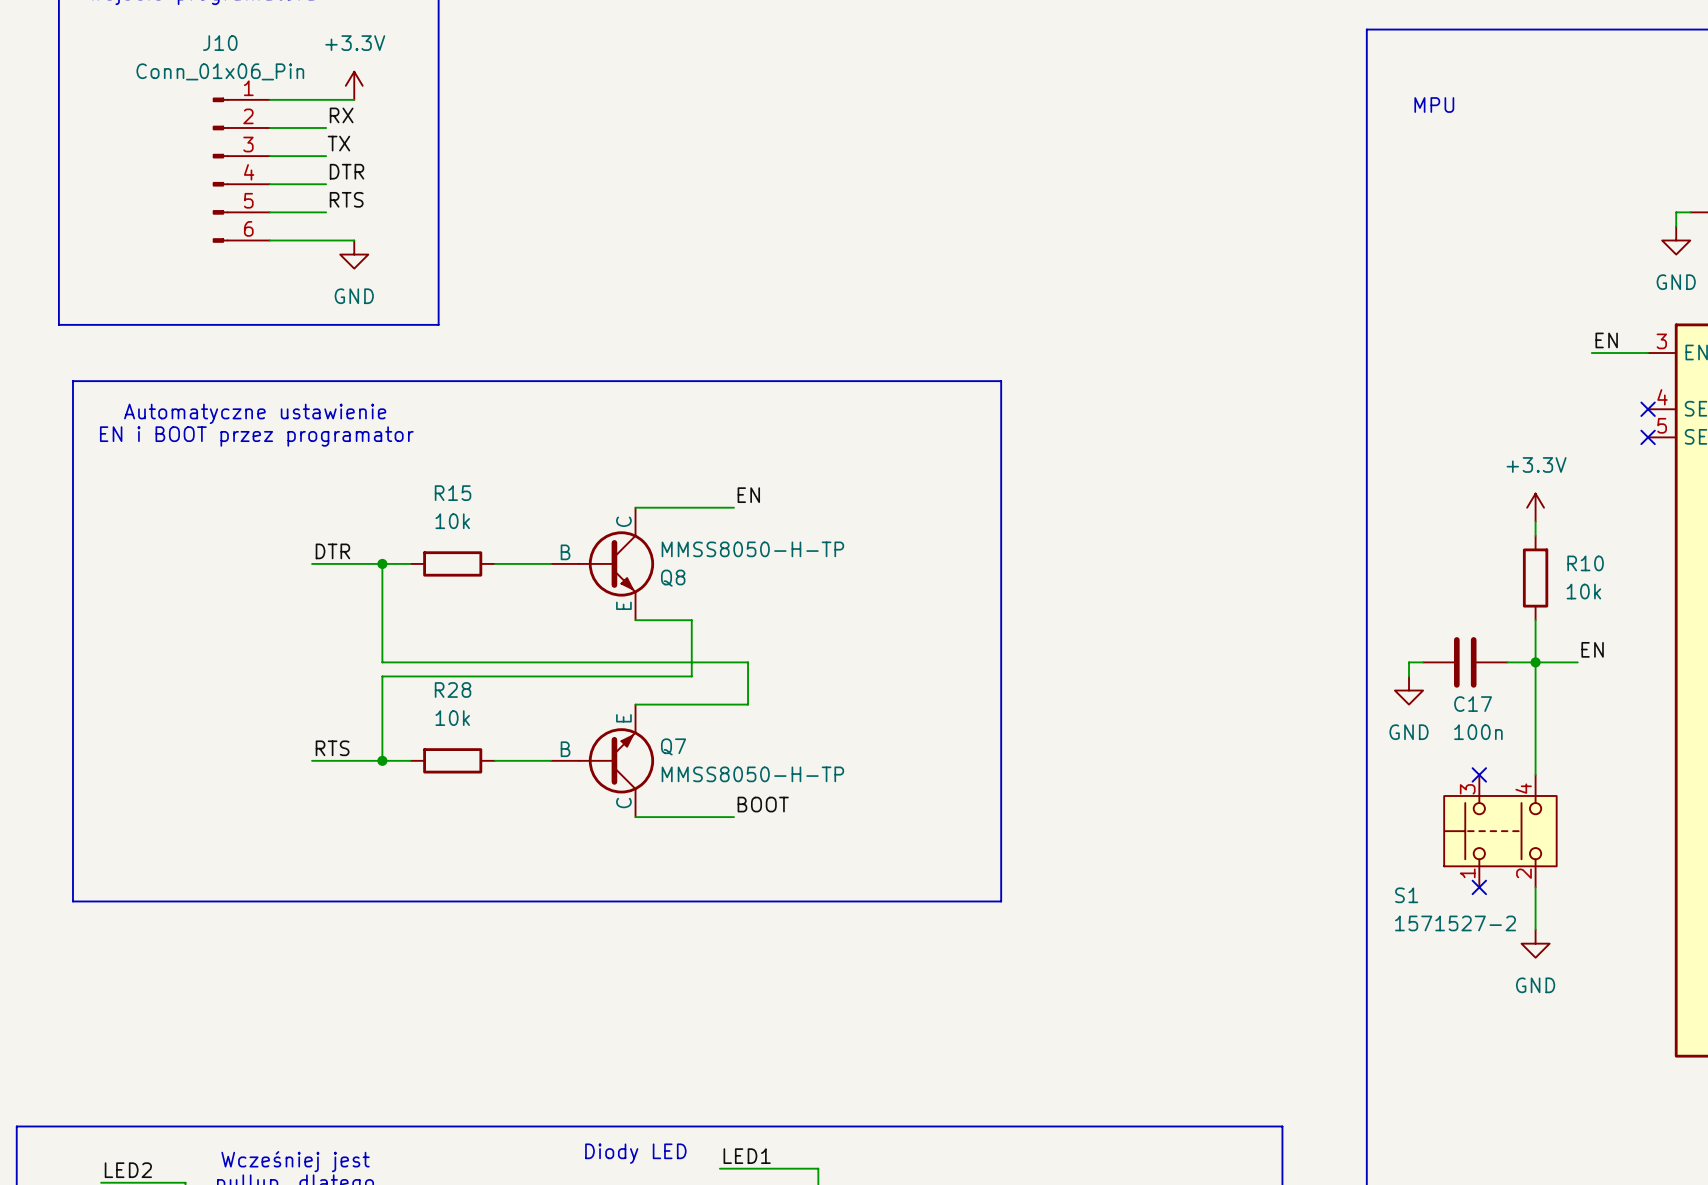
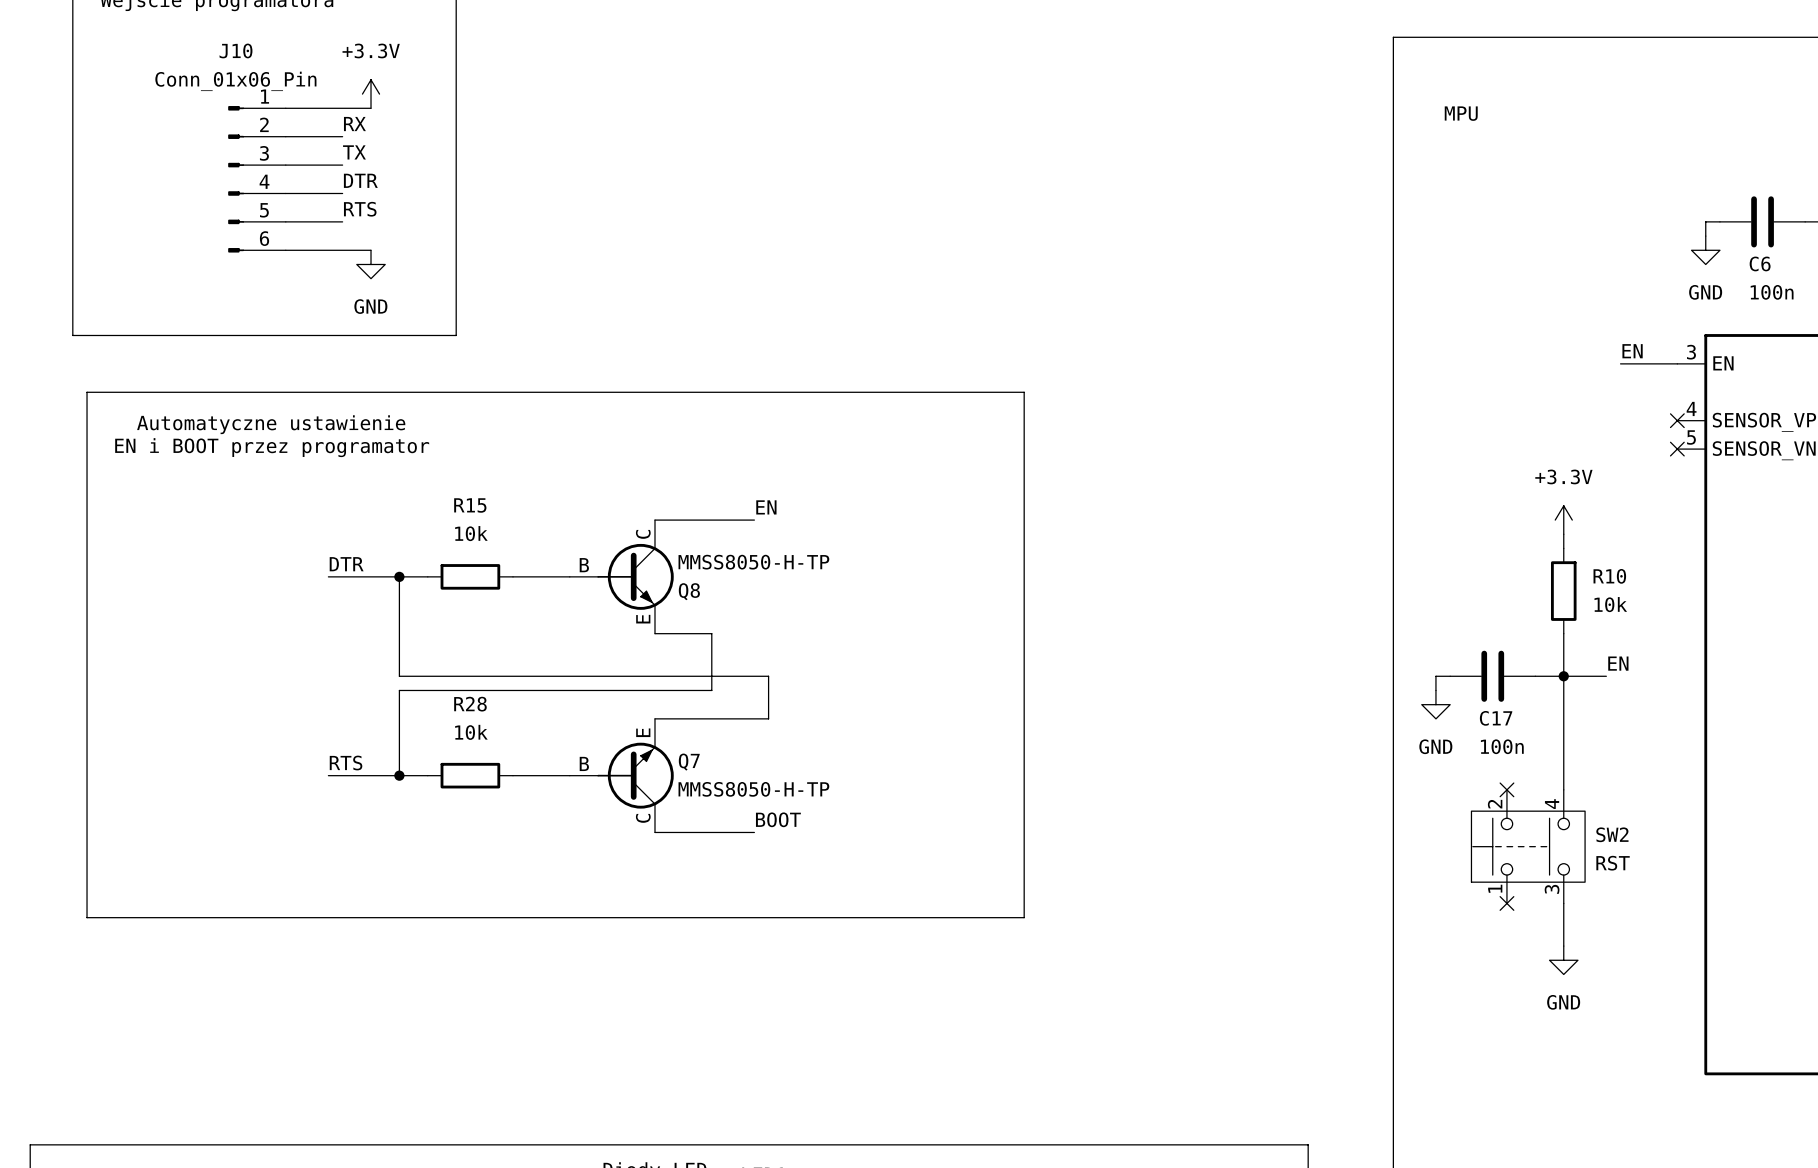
S1 pin number: 3 (1467, 789) -> 2 (1495, 804)
S1 pin number: 2 (1523, 873) -> 3 (1552, 889)
S1 name: S1 (1406, 895) -> SW2 (1612, 834)
S1 value: 1571527-2 (1455, 923) -> RST (1613, 863)

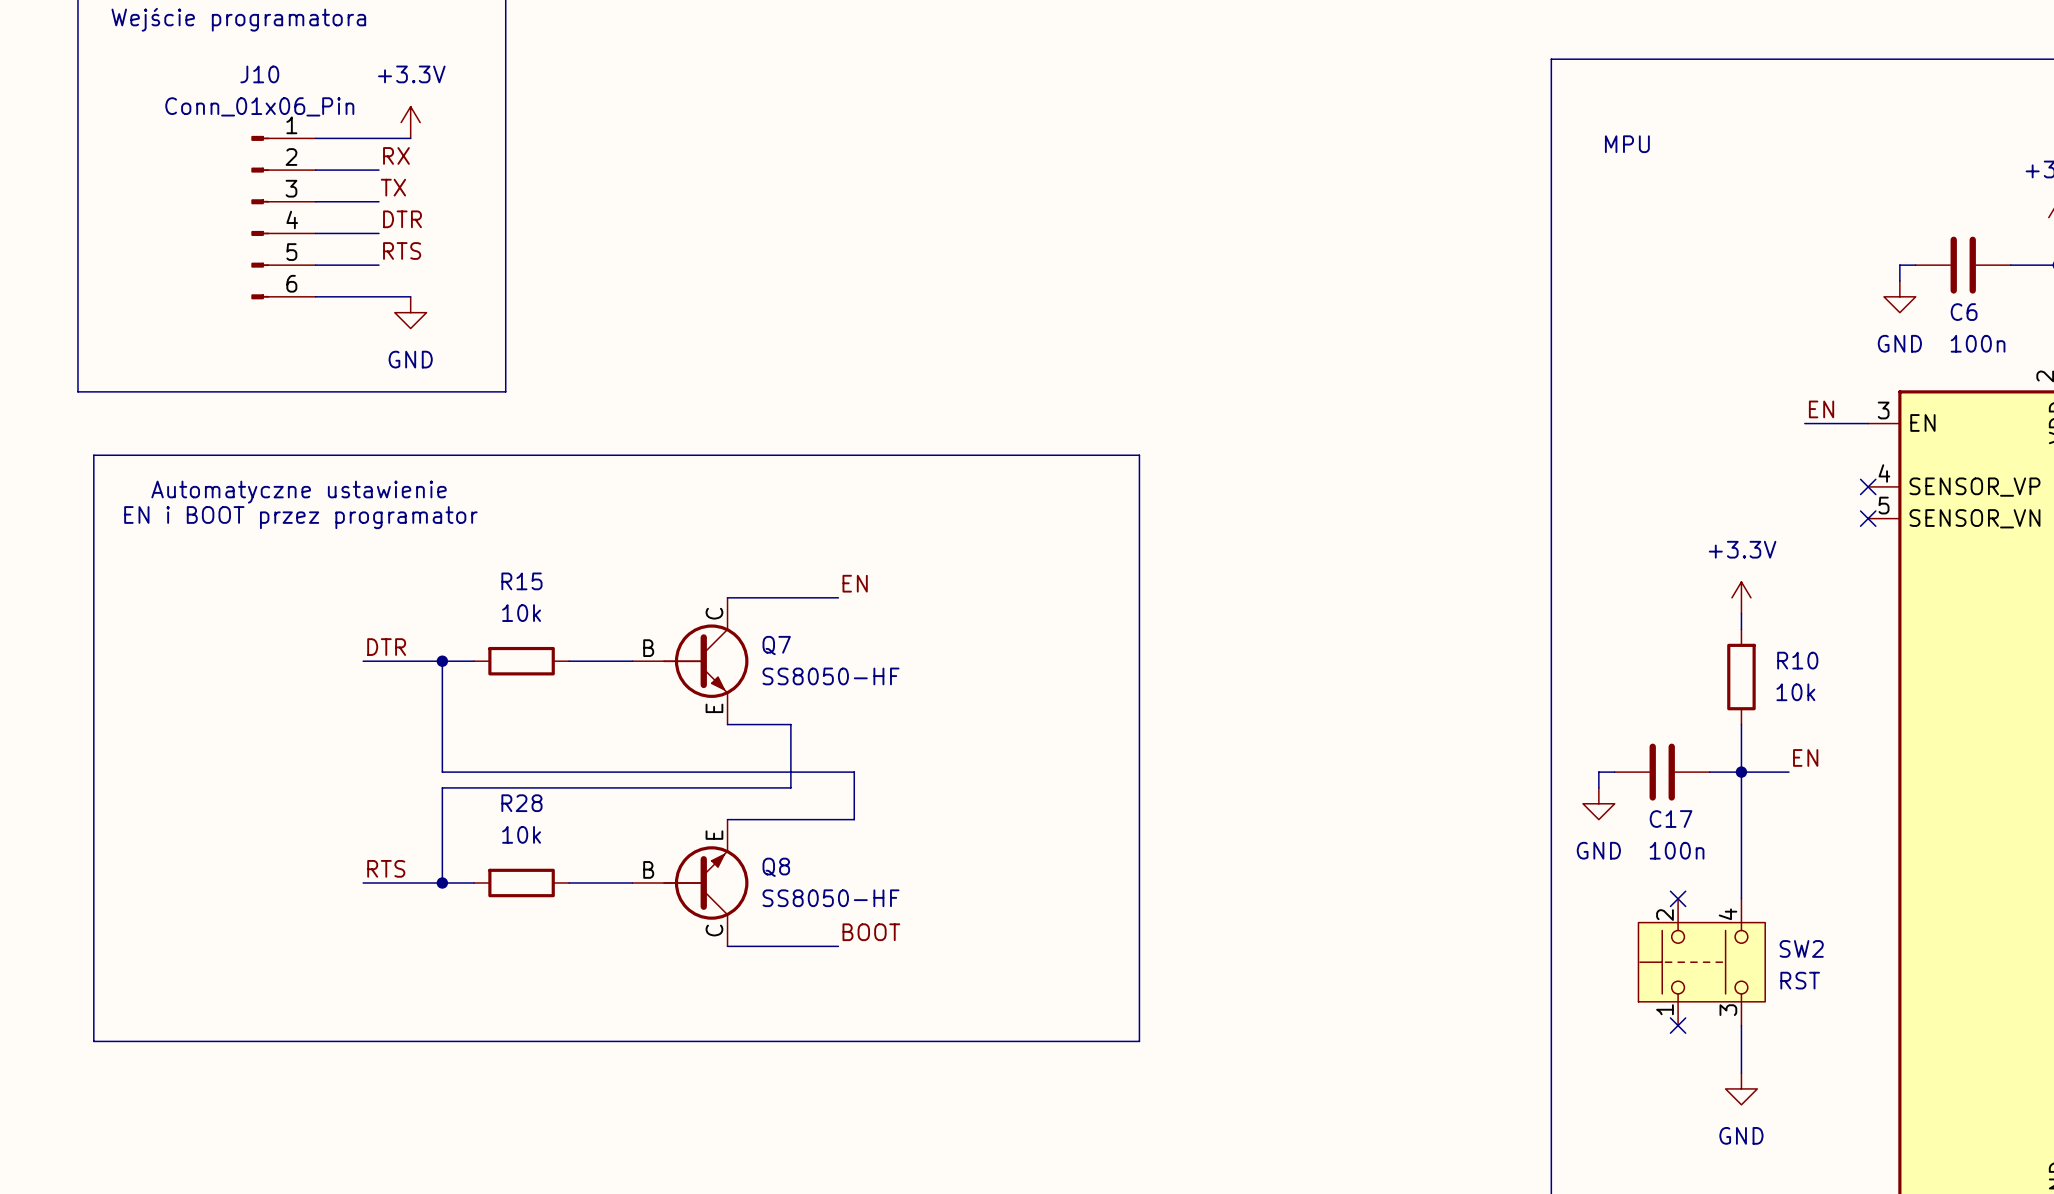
Q8 value: MMSS8050-H-TP (753, 562) -> SS8050-HF (830, 676)
Q8 name: Q8 (689, 591) -> Q7 (776, 645)
Q7 name: Q7 (689, 762) -> Q8 (776, 867)
Q7 value: MMSS8050-H-TP (753, 789) -> SS8050-HF (830, 898)

